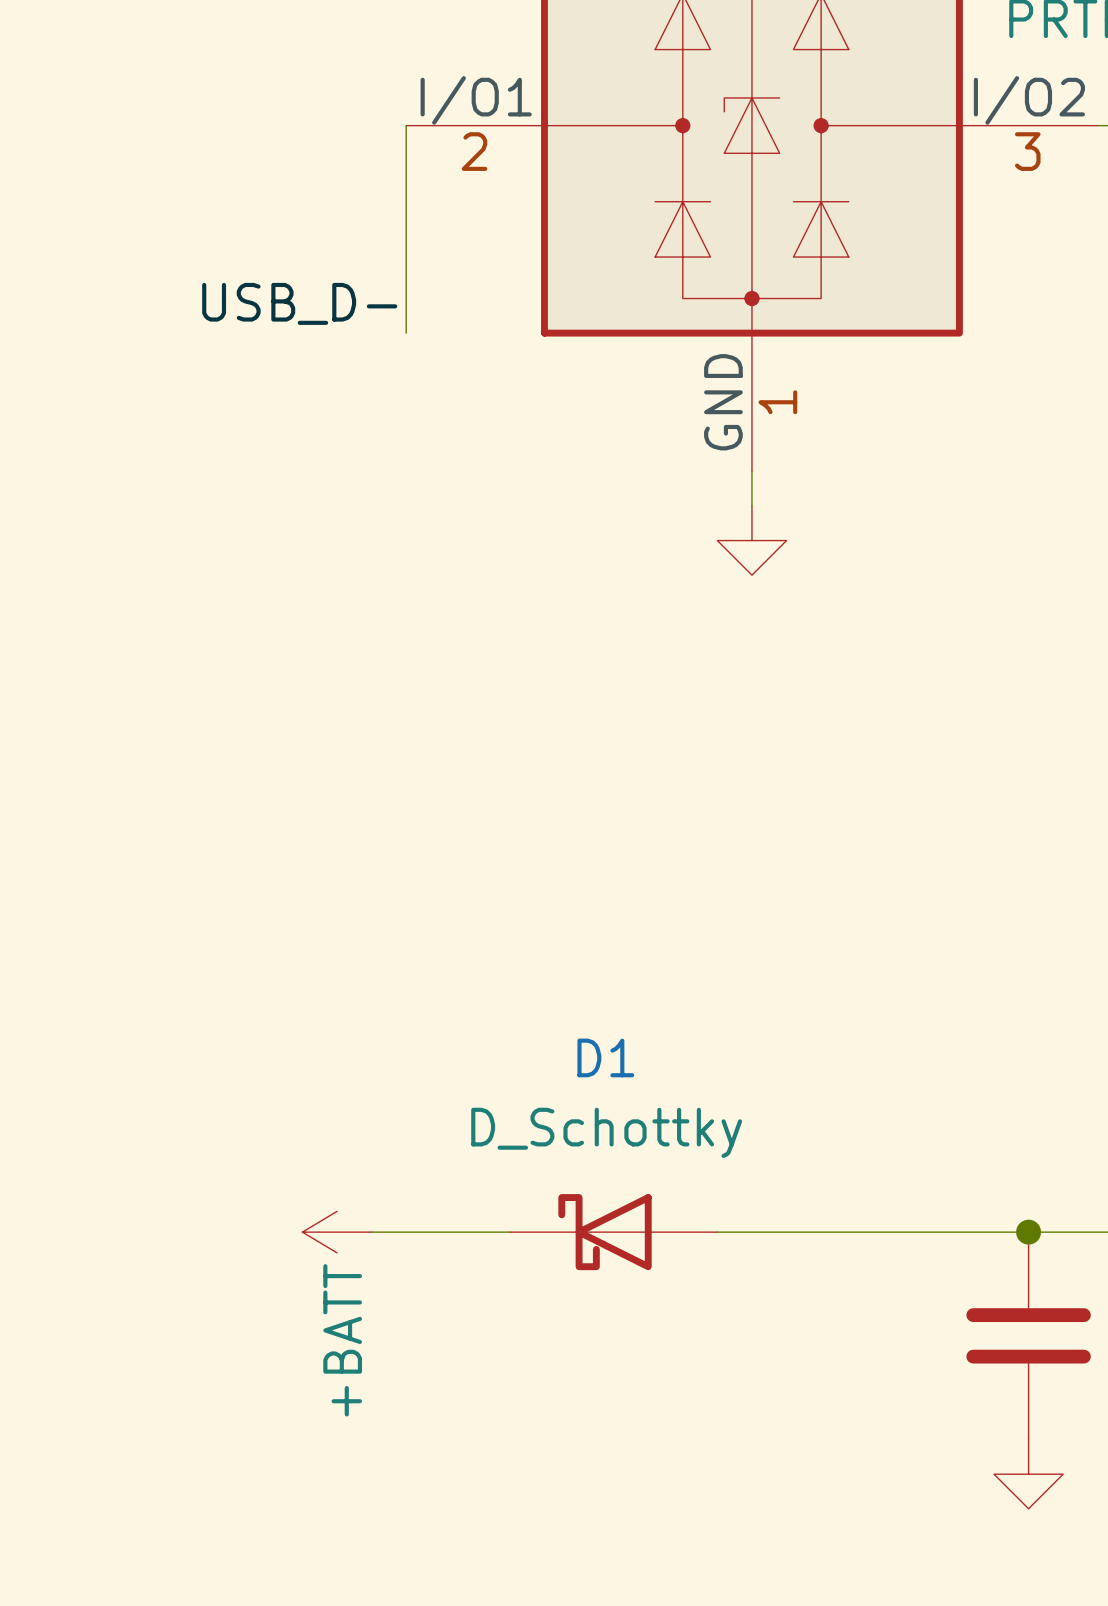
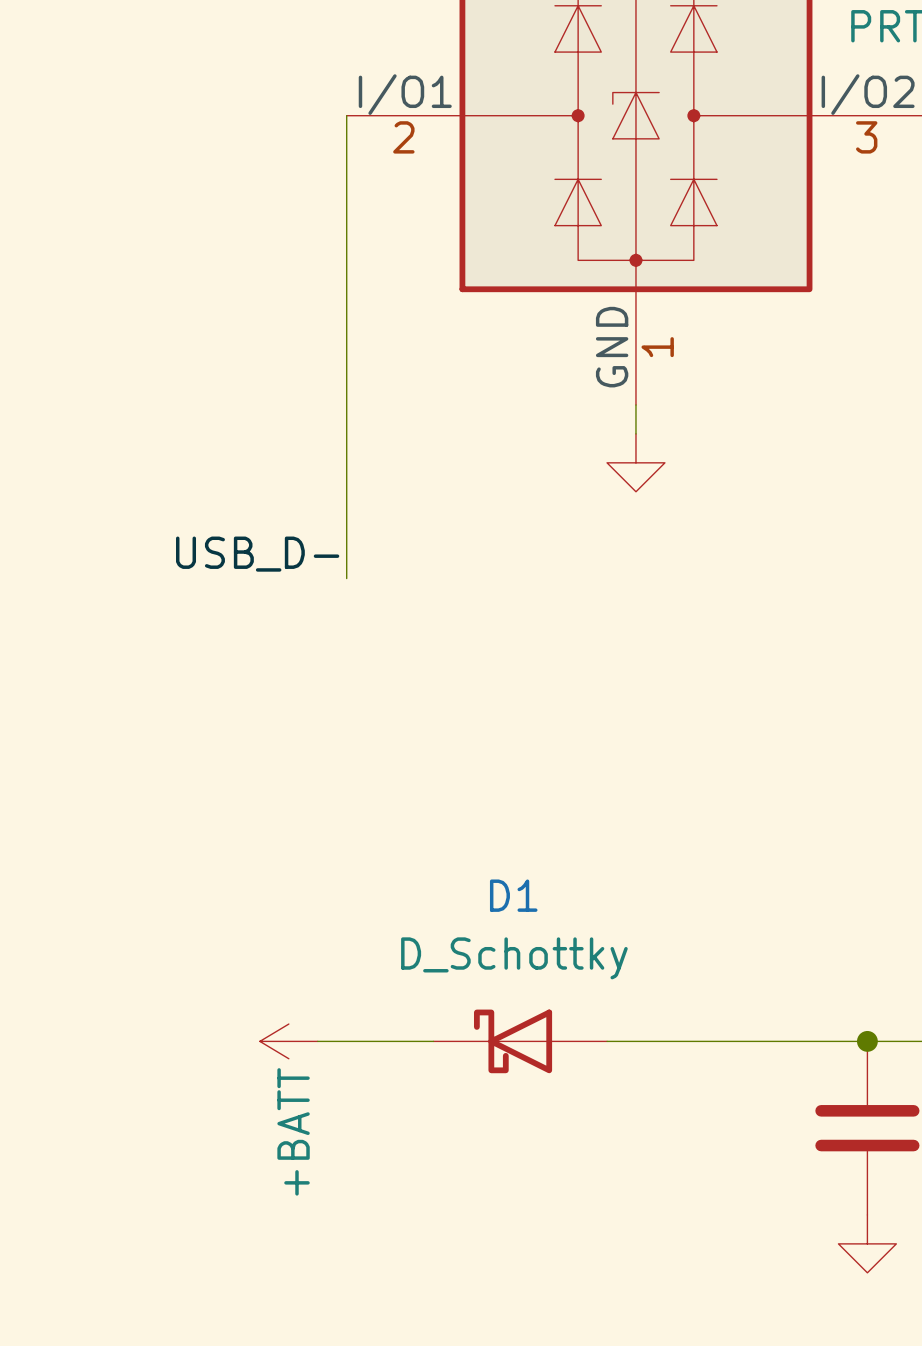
label position: USB_D- (299, 303) -> USB_D- (257, 554)
wire: none -> (346, 289) (346, 578)

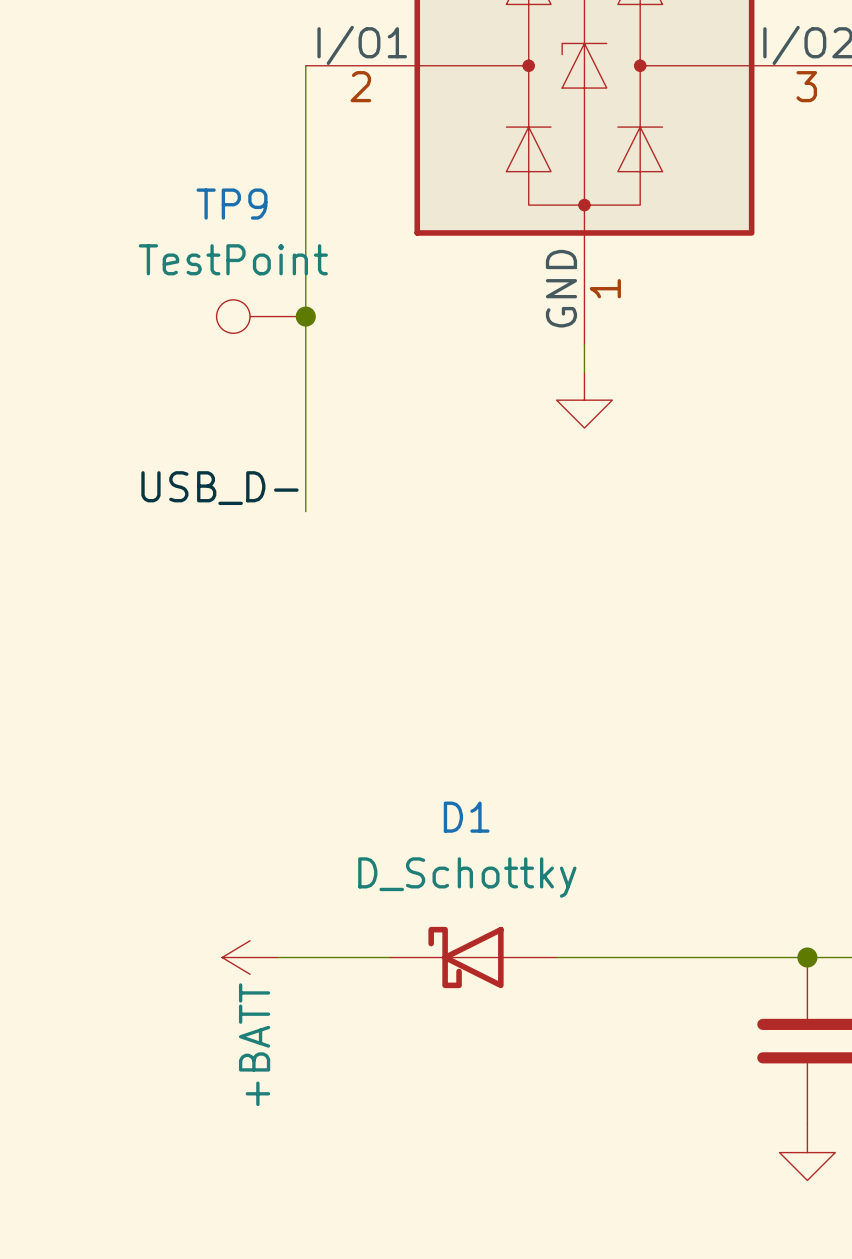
TP9: none -> TestPoint (261, 316)
junction: none -> (305, 316)

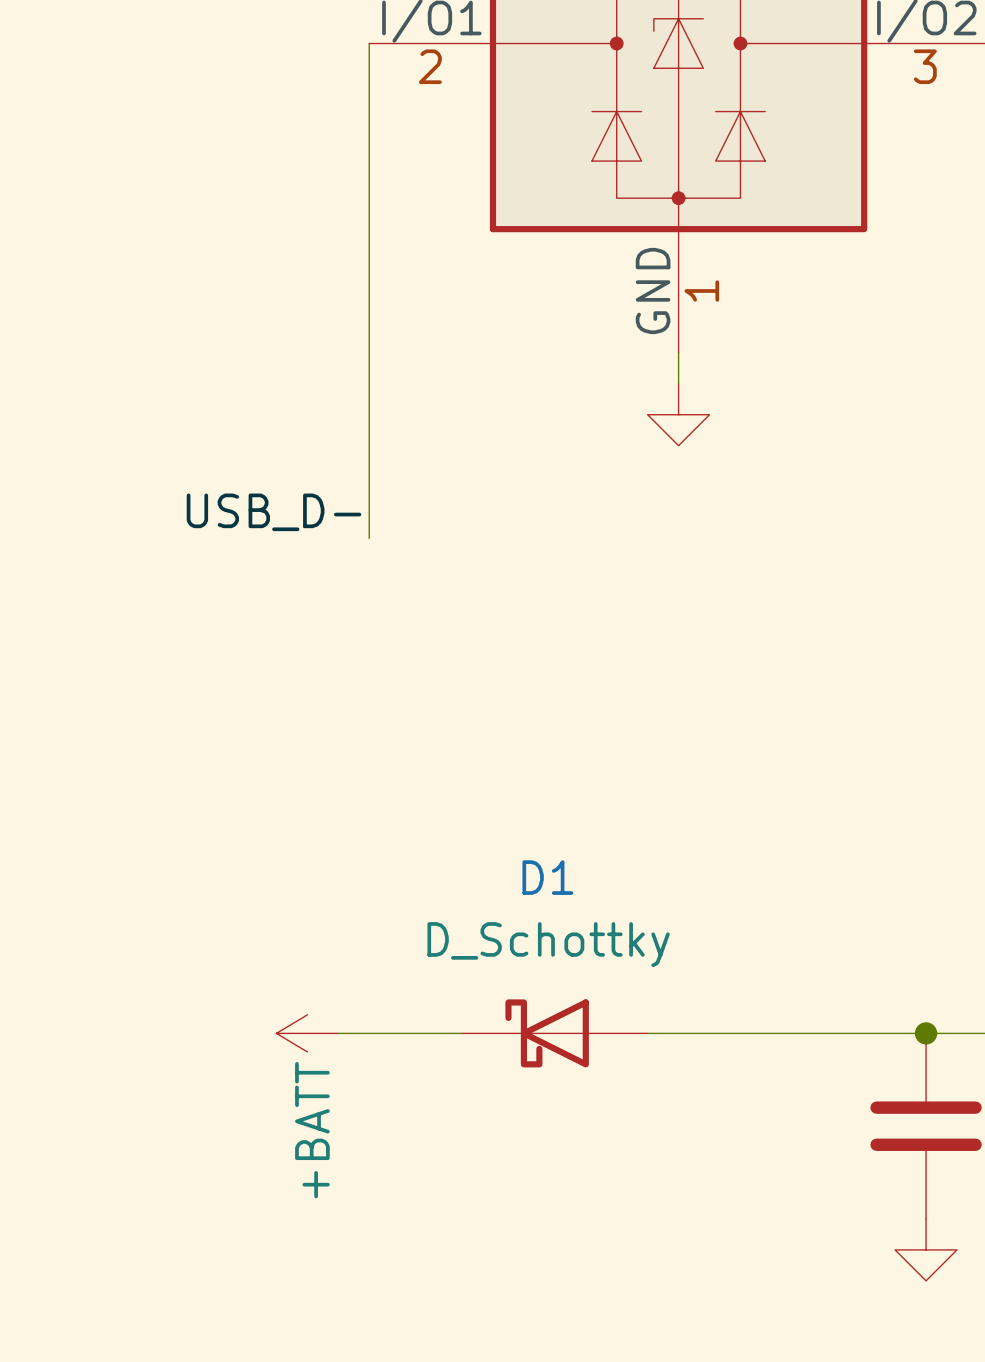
TP9: TestPoint (261, 316) -> none
junction: (305, 316) -> none

